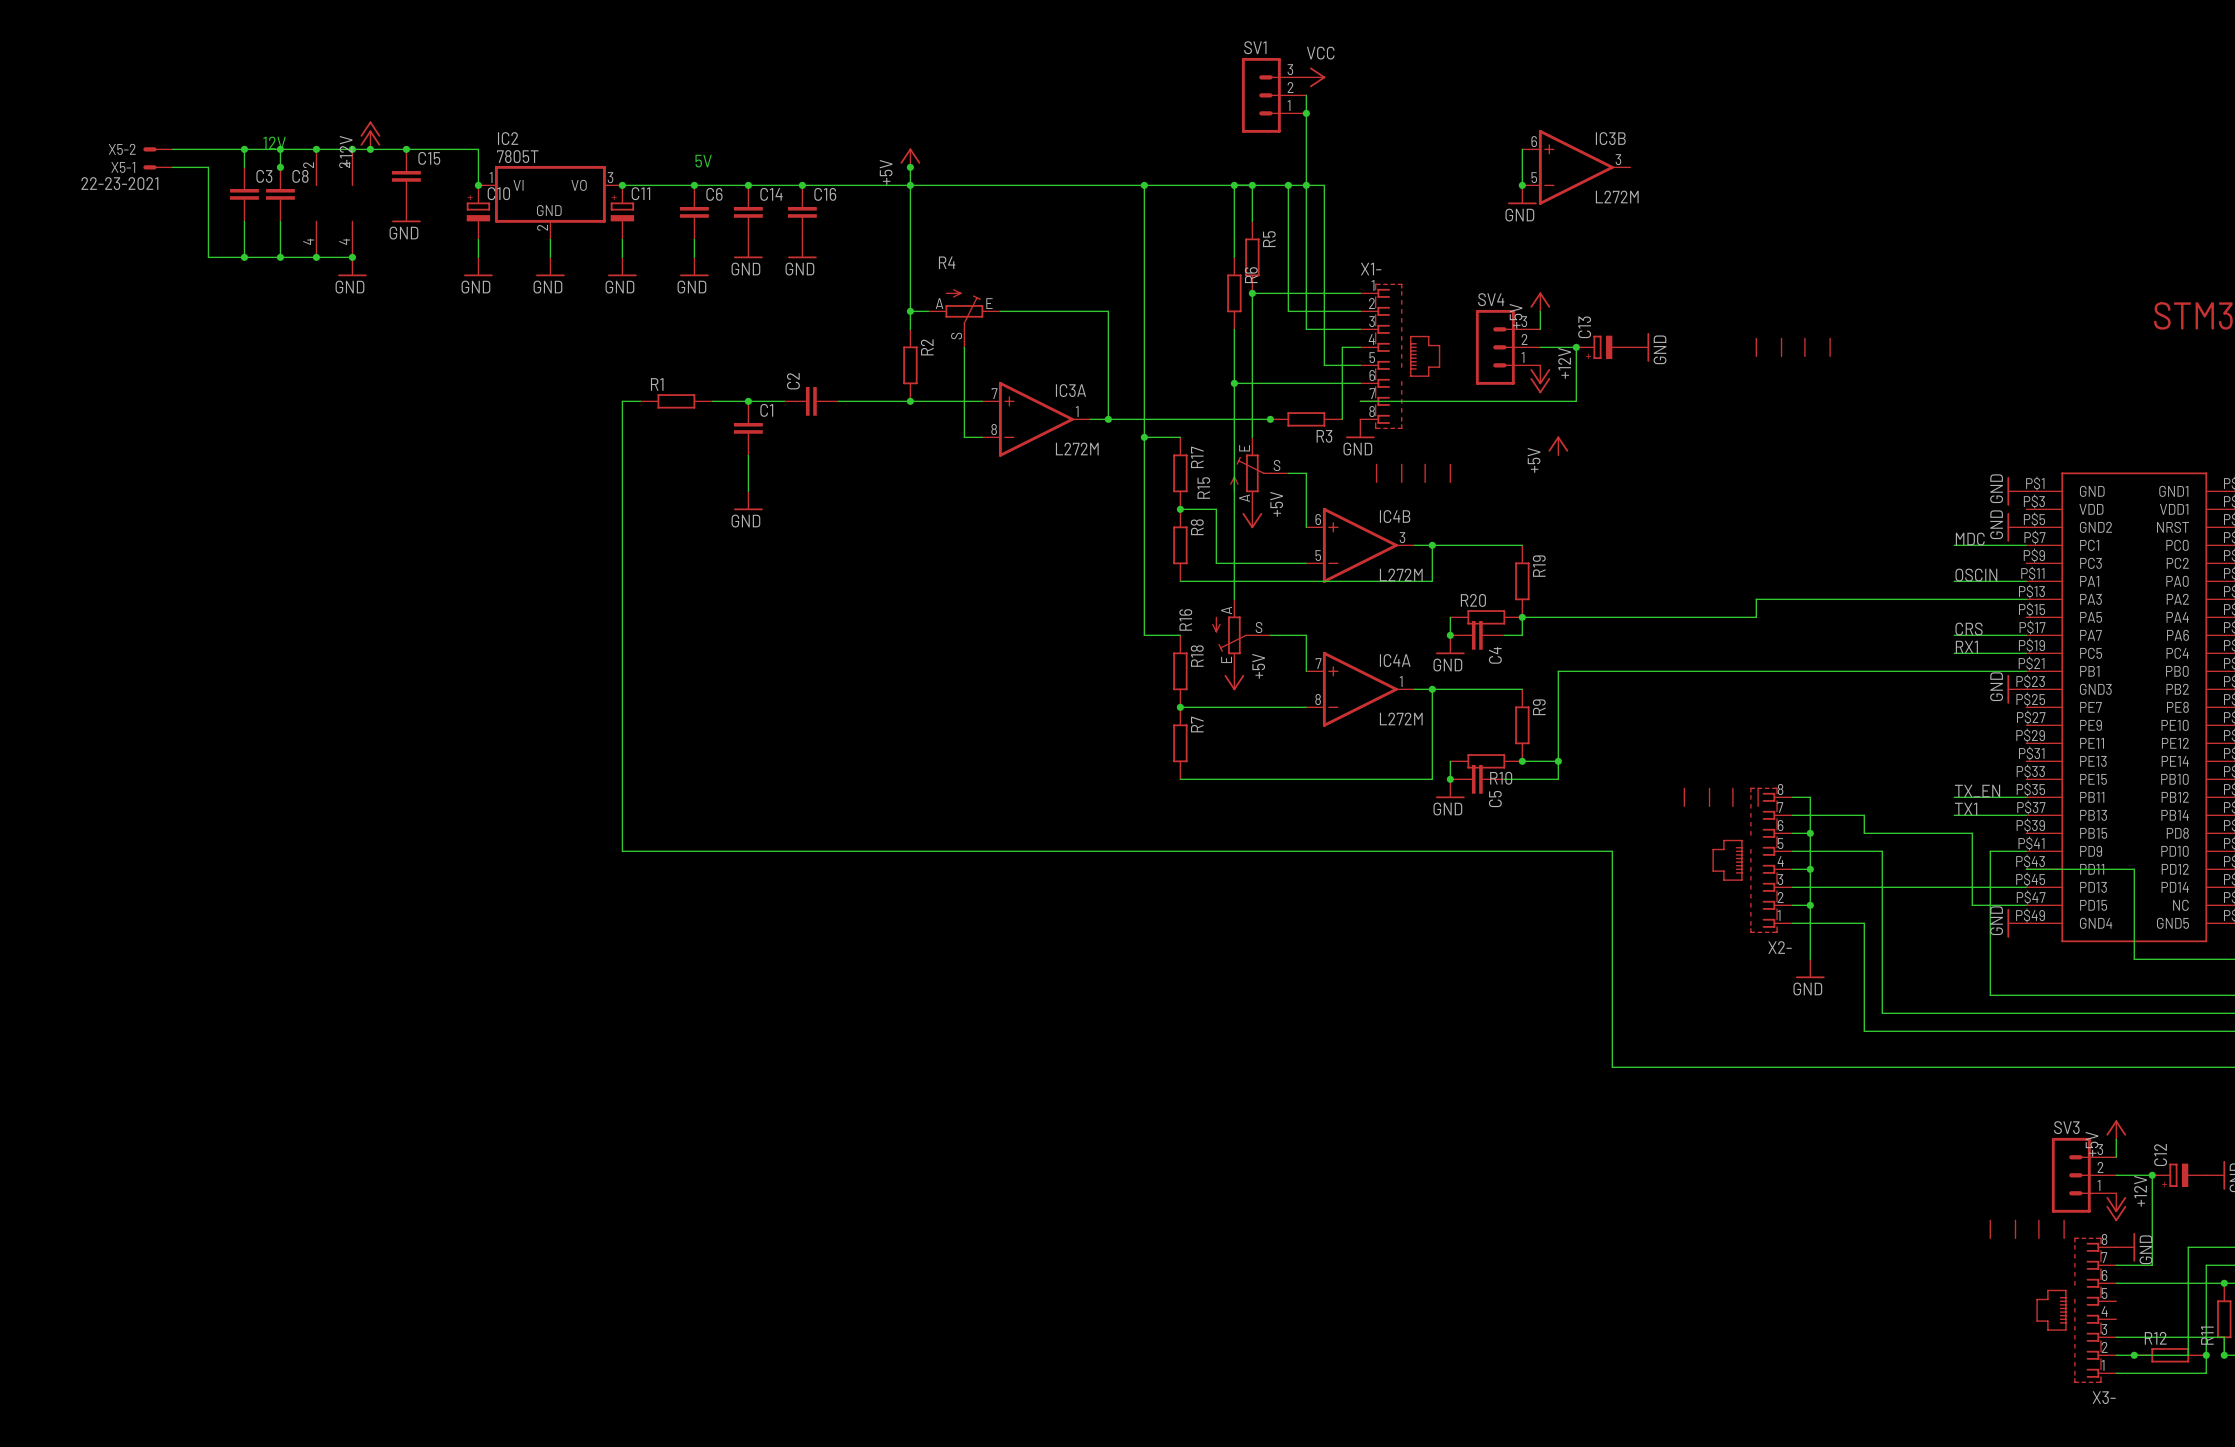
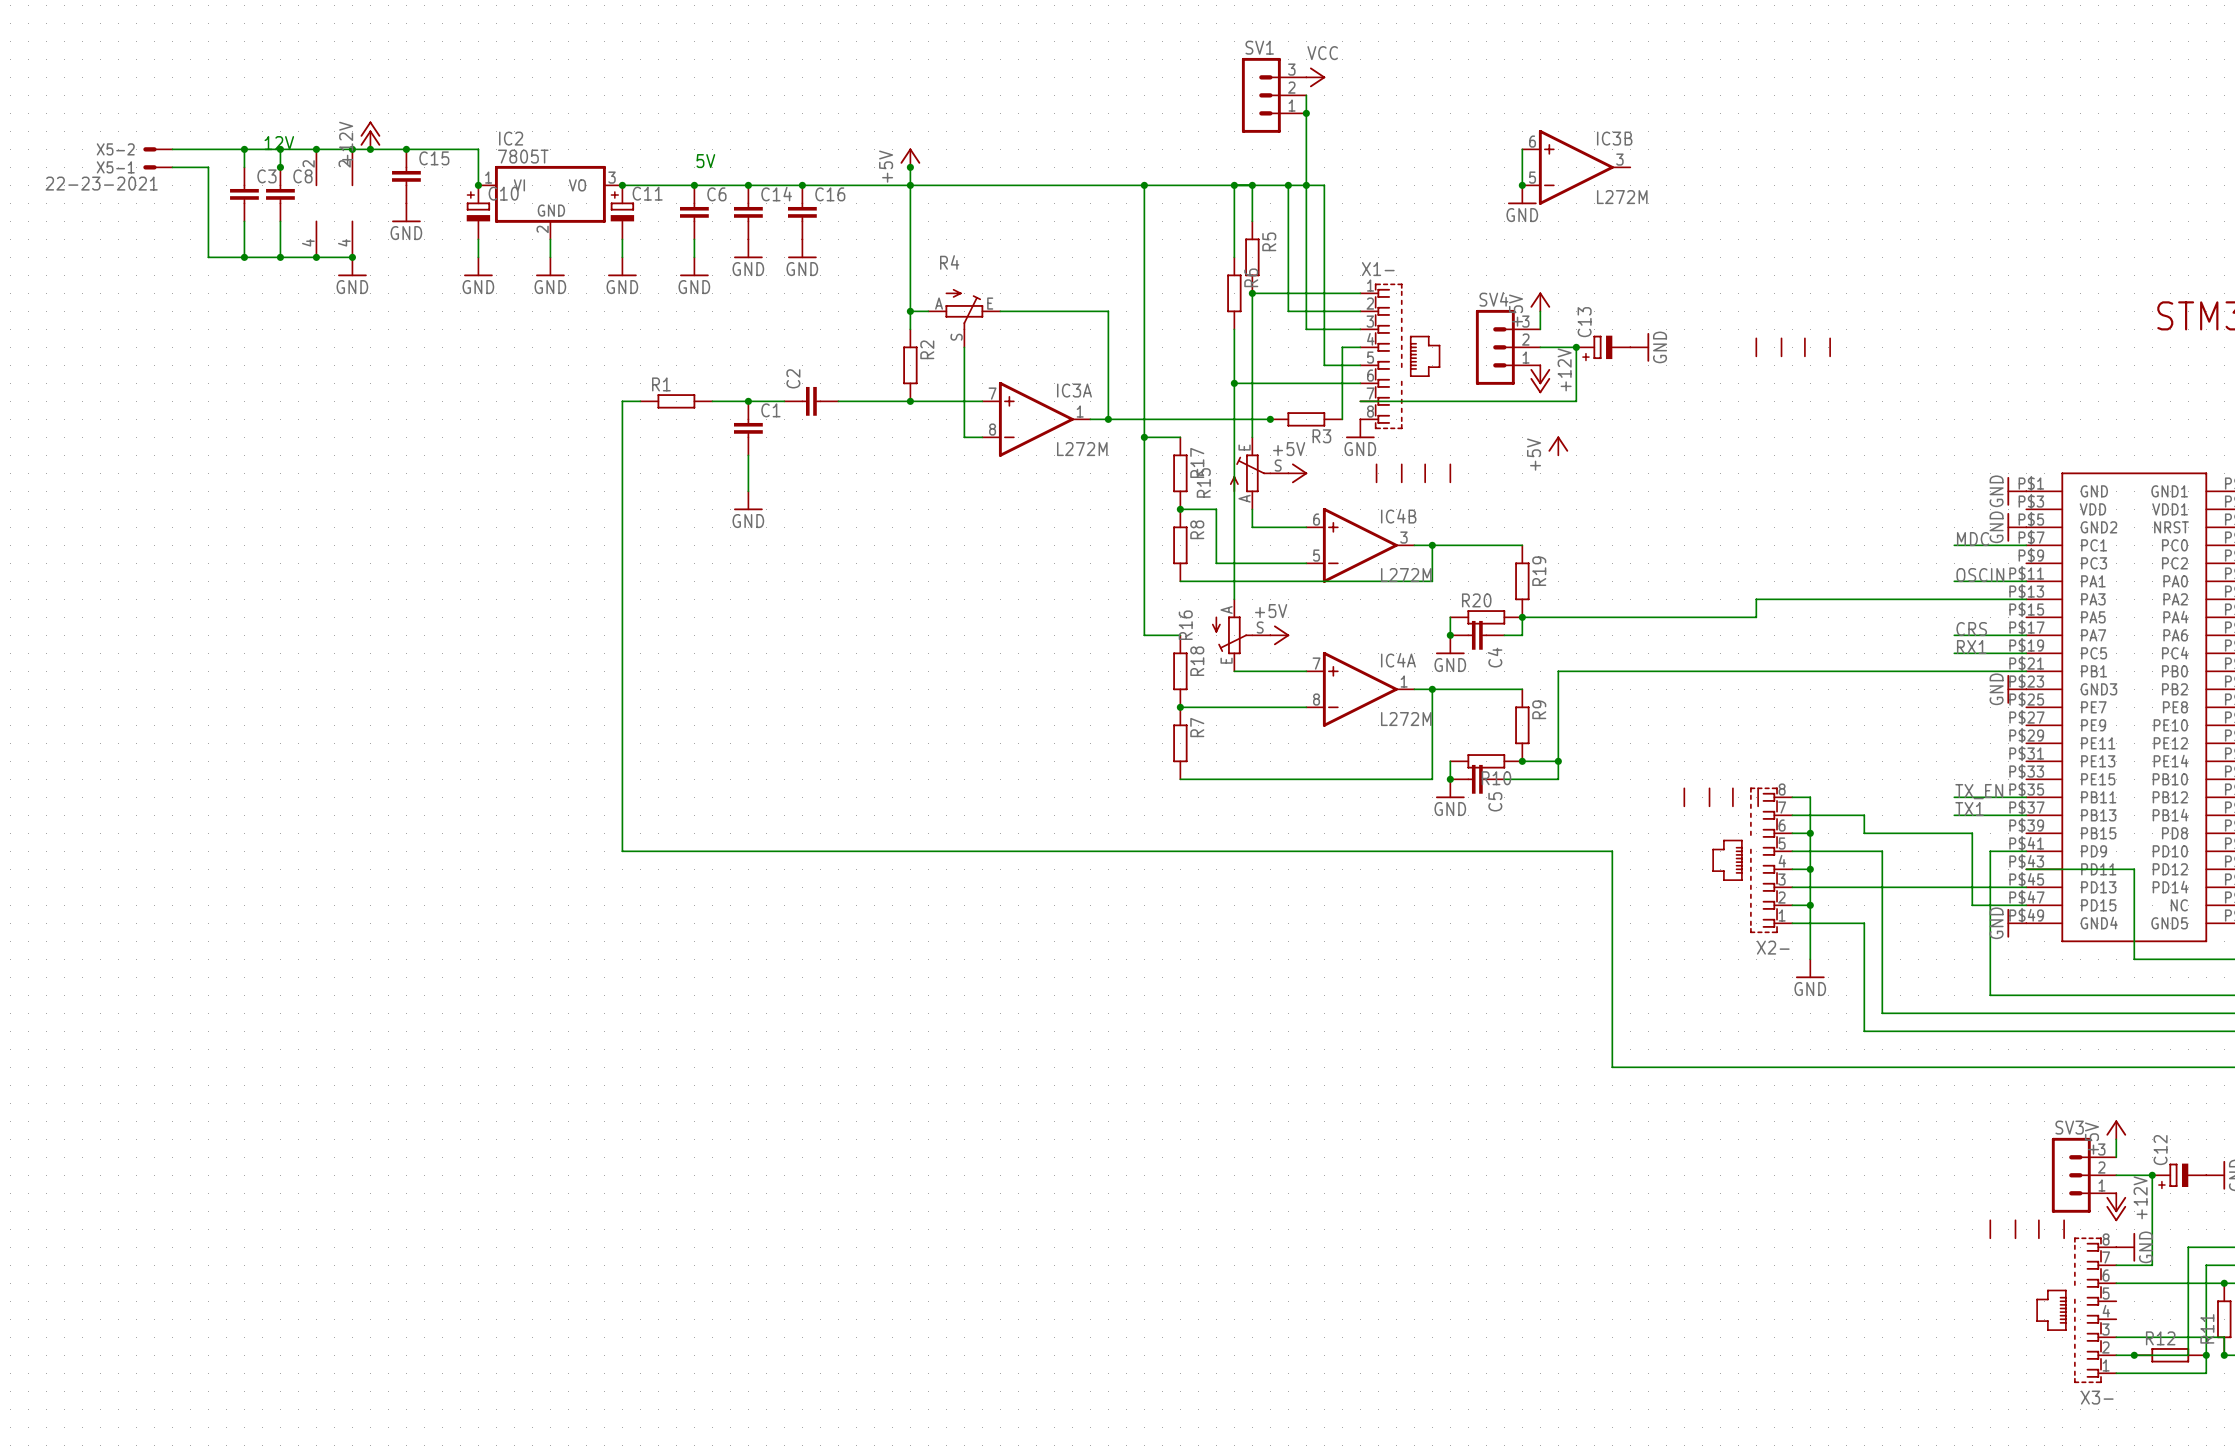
wire: (1288, 473) (1306, 473) (1306, 527) -> (1252, 509) (1252, 527) (1306, 527)
power symbol: none -> +5V (1297, 473)
power symbol: +5V (1252, 518) -> none
wire: (1270, 635) (1306, 635) (1306, 671) -> (1234, 671) (1306, 671)
power symbol: none -> +5V (1279, 635)
power symbol: +5V (1234, 680) -> none

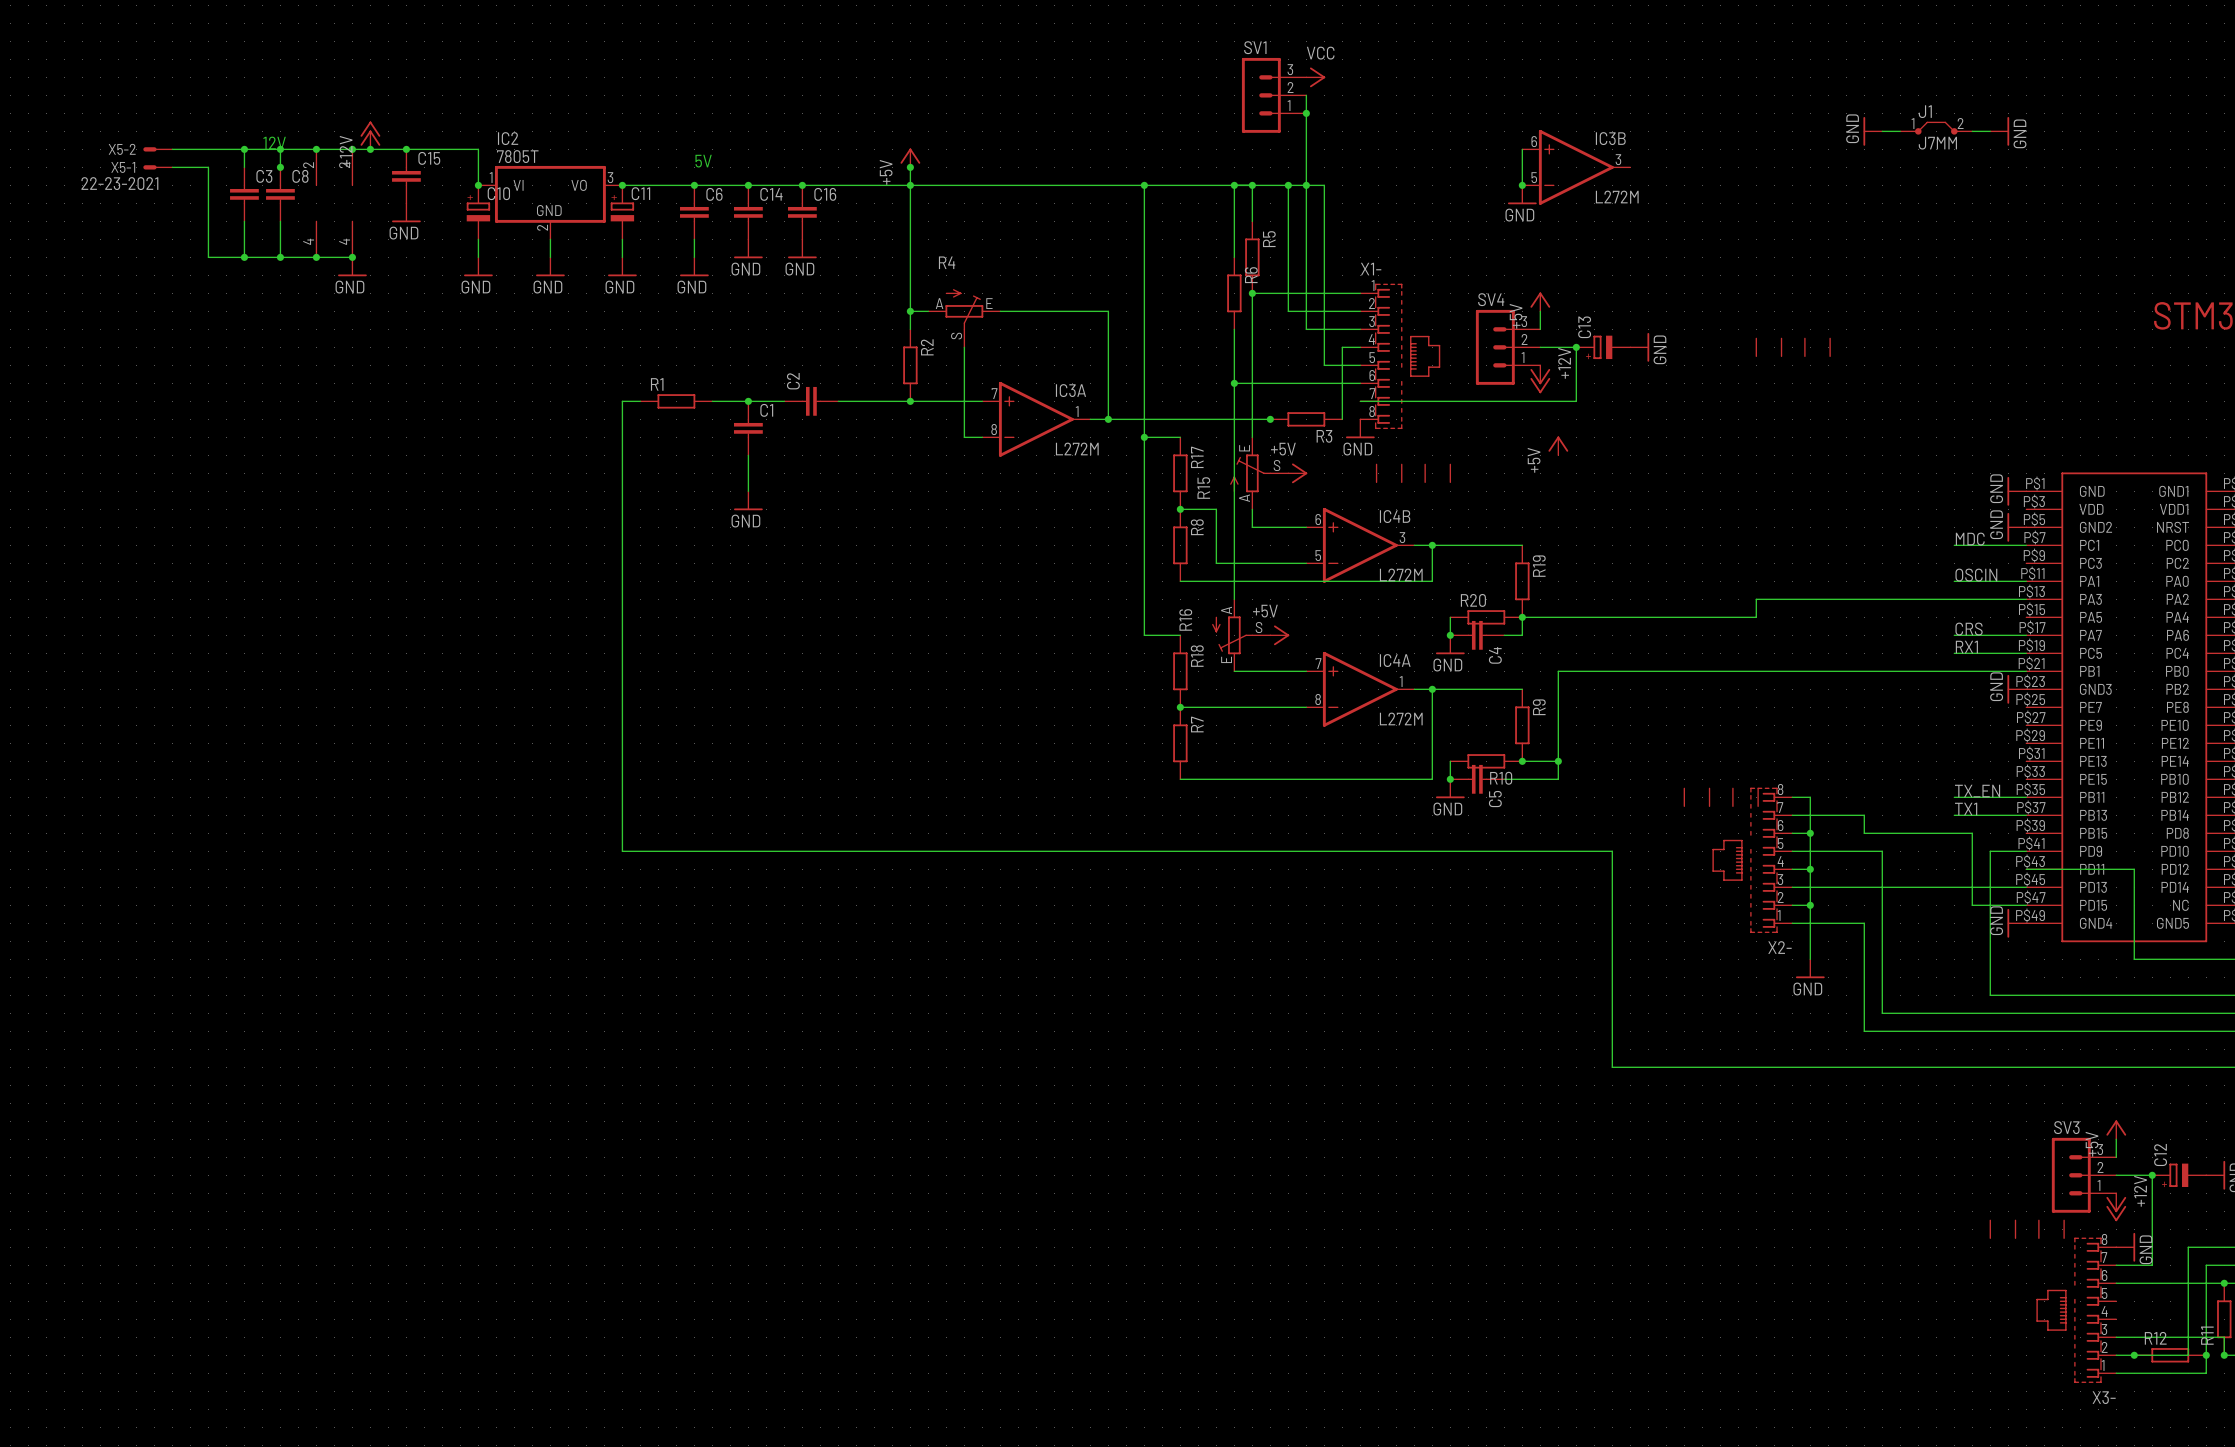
J1: none -> J7MM (1936, 128)
power symbol: none -> GND (1872, 131)
wire: none -> (1882, 131) (1900, 131)
wire: none -> (1972, 131) (1990, 131)
power symbol: none -> GND (1999, 131)

